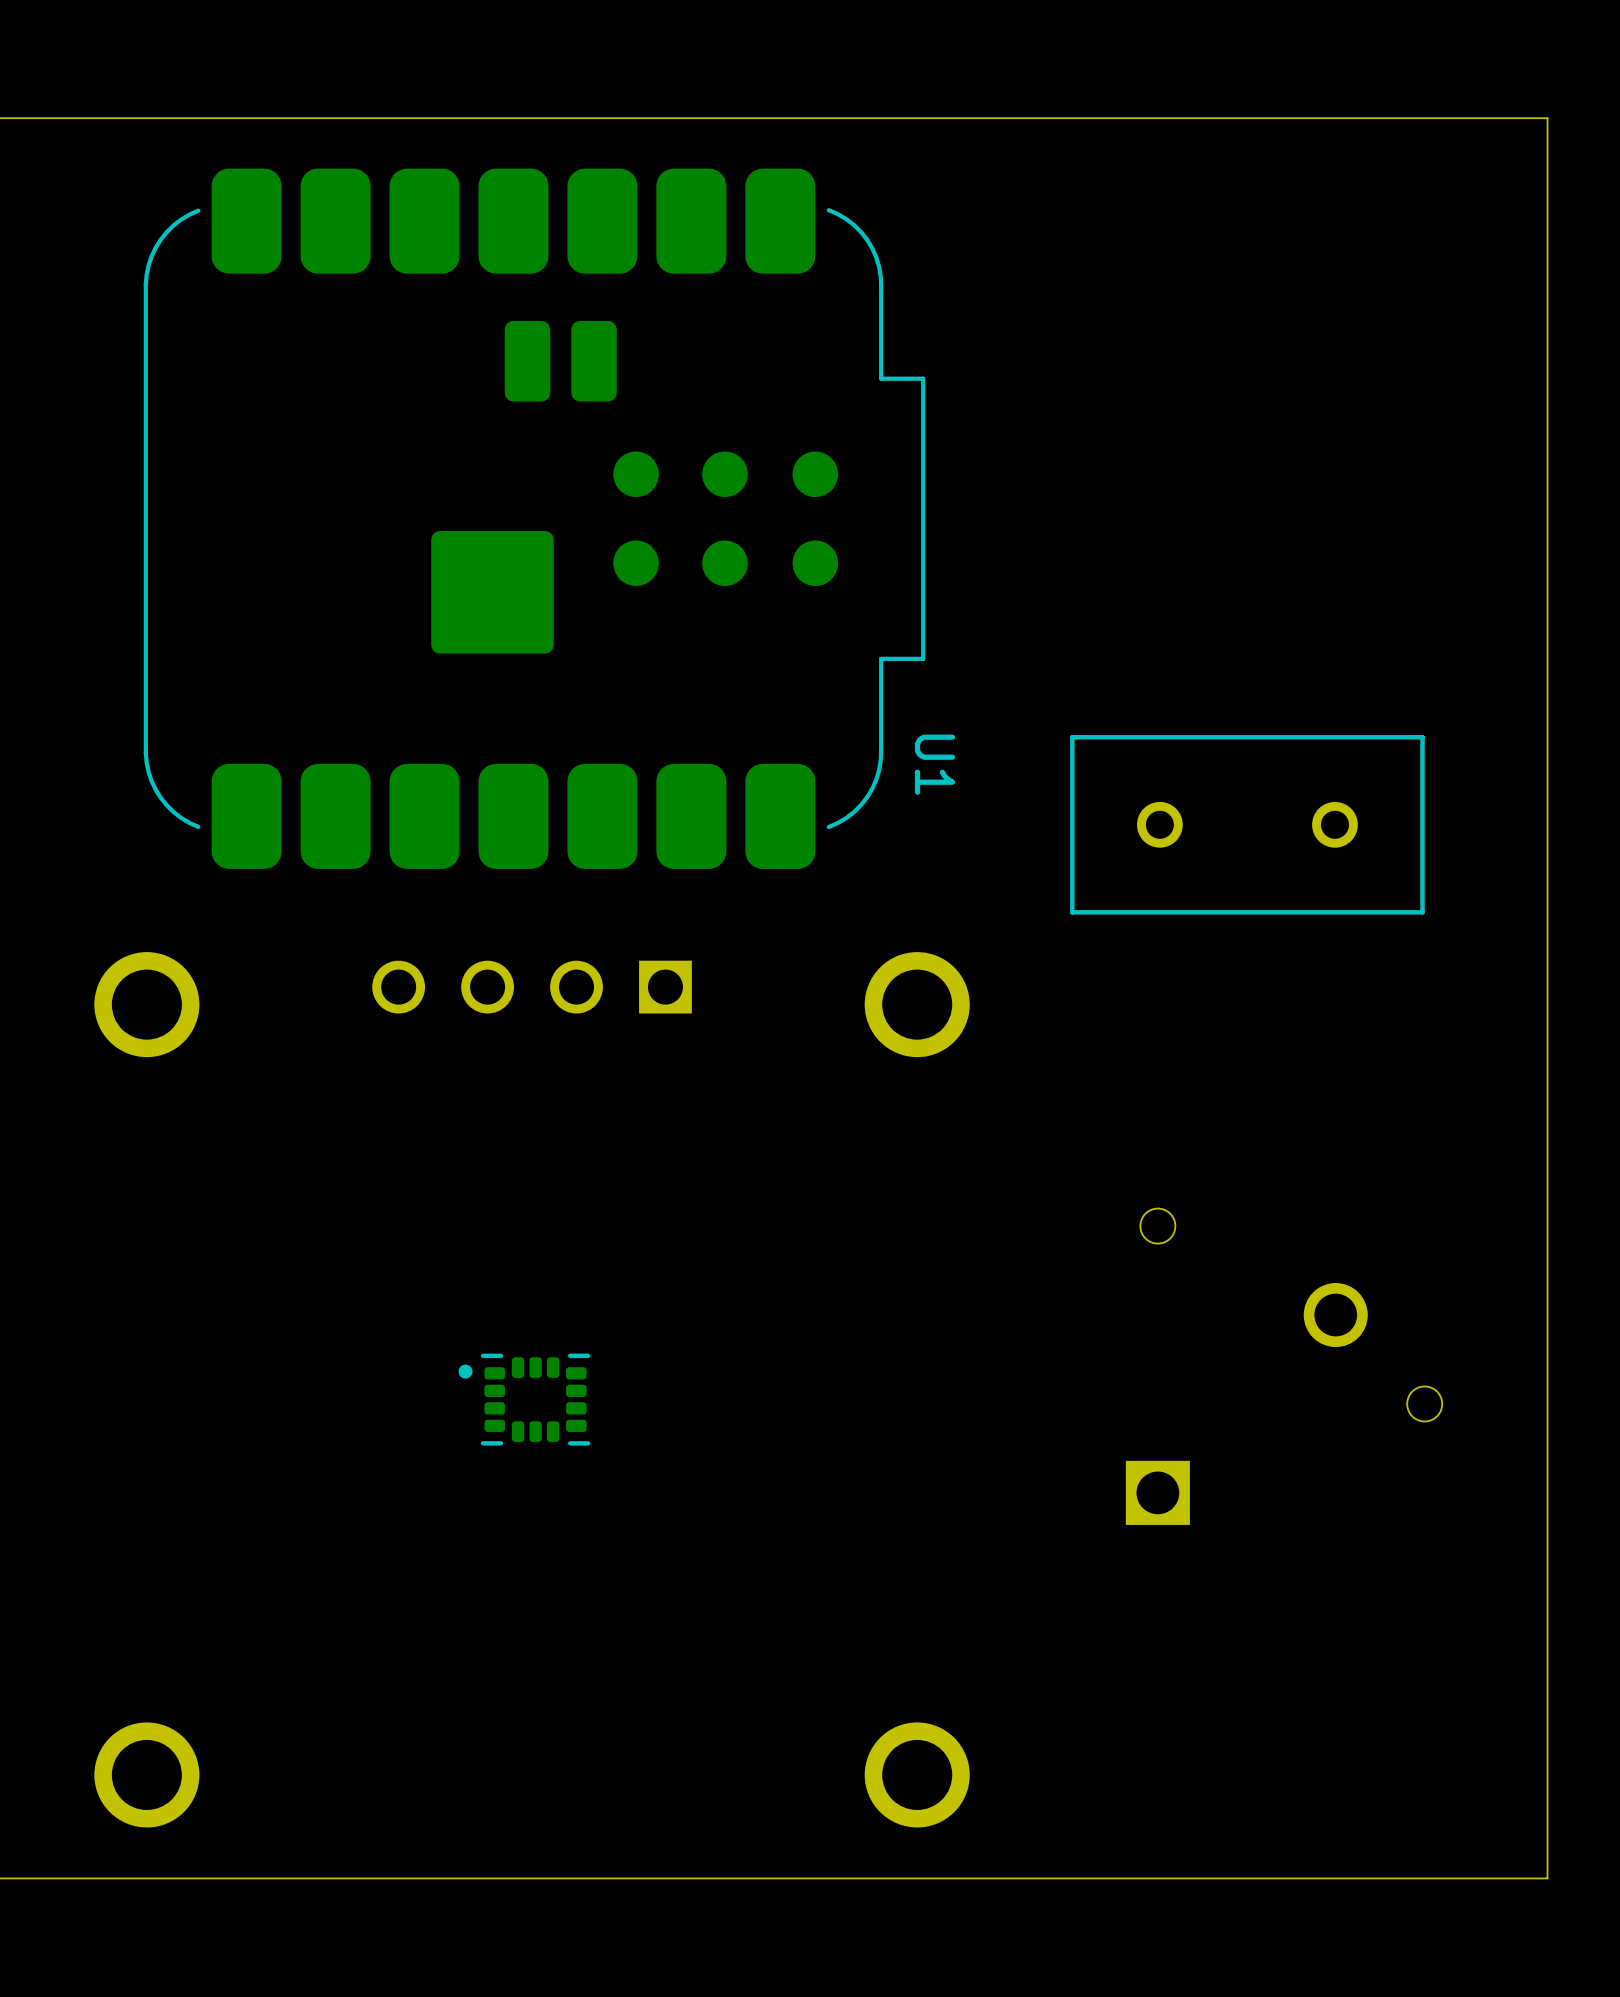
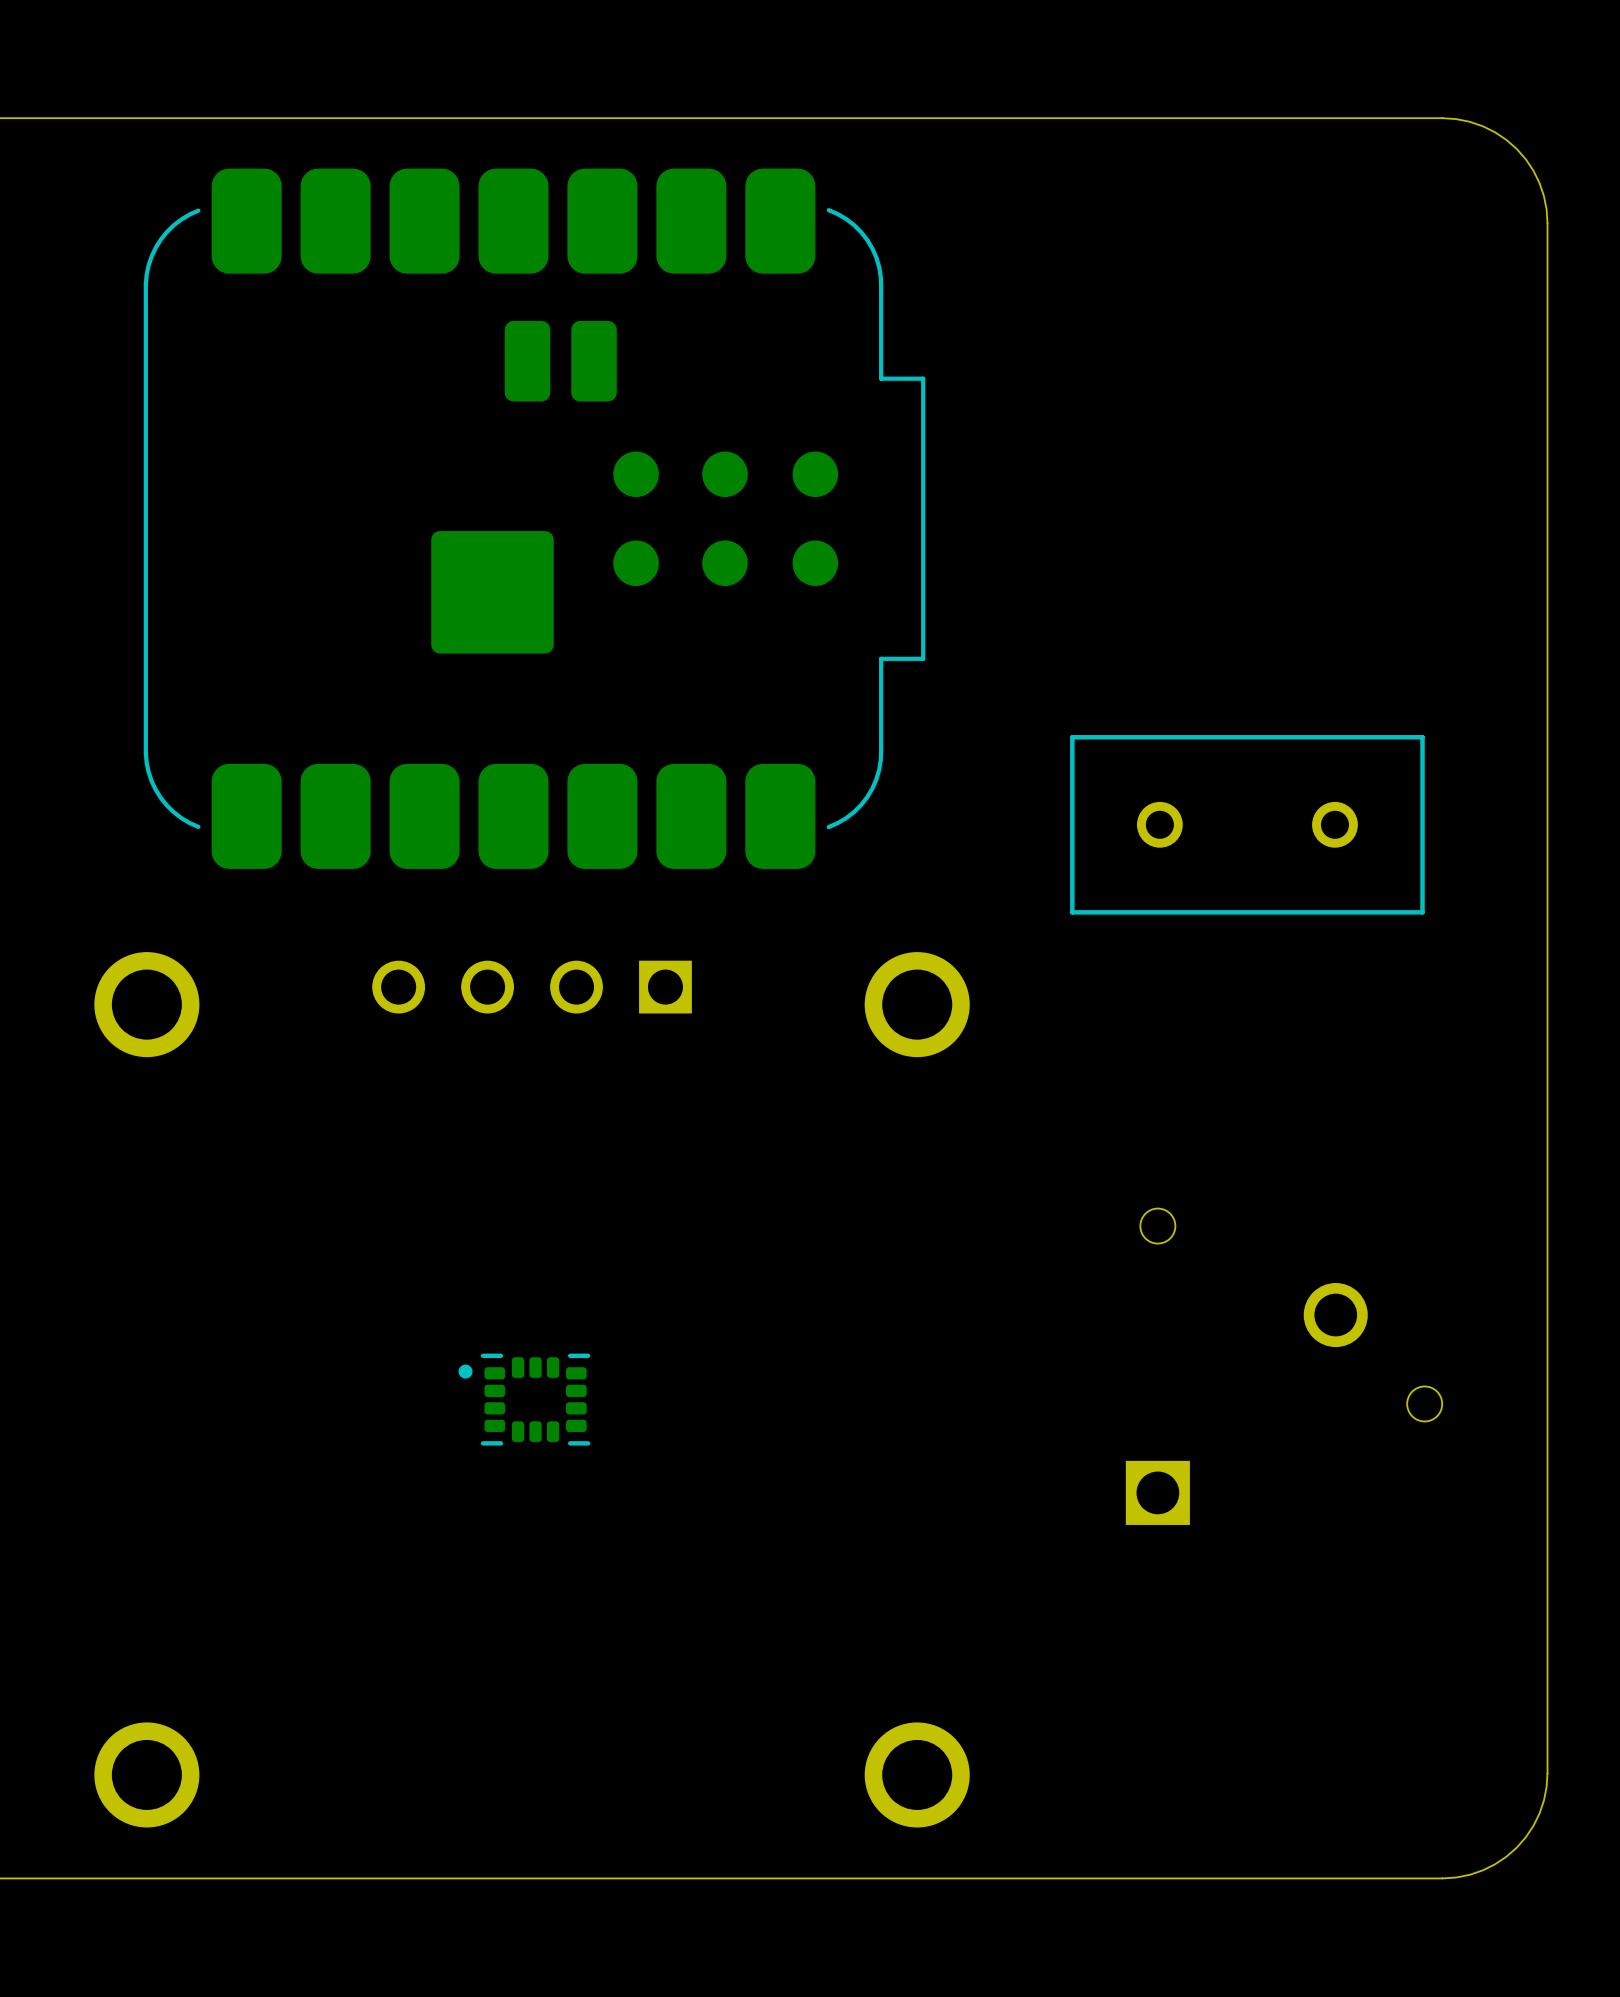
board edge: (1442, 118) (1547, 118) (1547, 223) -> (1442, 118) (1469, 121) (1482, 126) (1506, 139) (1516, 148) (1533, 170) (1539, 183) (1546, 209) (1547, 223)
U1 name: U1 (934, 764) -> none
board edge: (1547, 1773) (1547, 1878) (1442, 1878) -> (1547, 1773) (1543, 1800) (1539, 1813) (1533, 1825) (1516, 1847) (1494, 1864) (1482, 1870) (1456, 1877) (1442, 1878)

